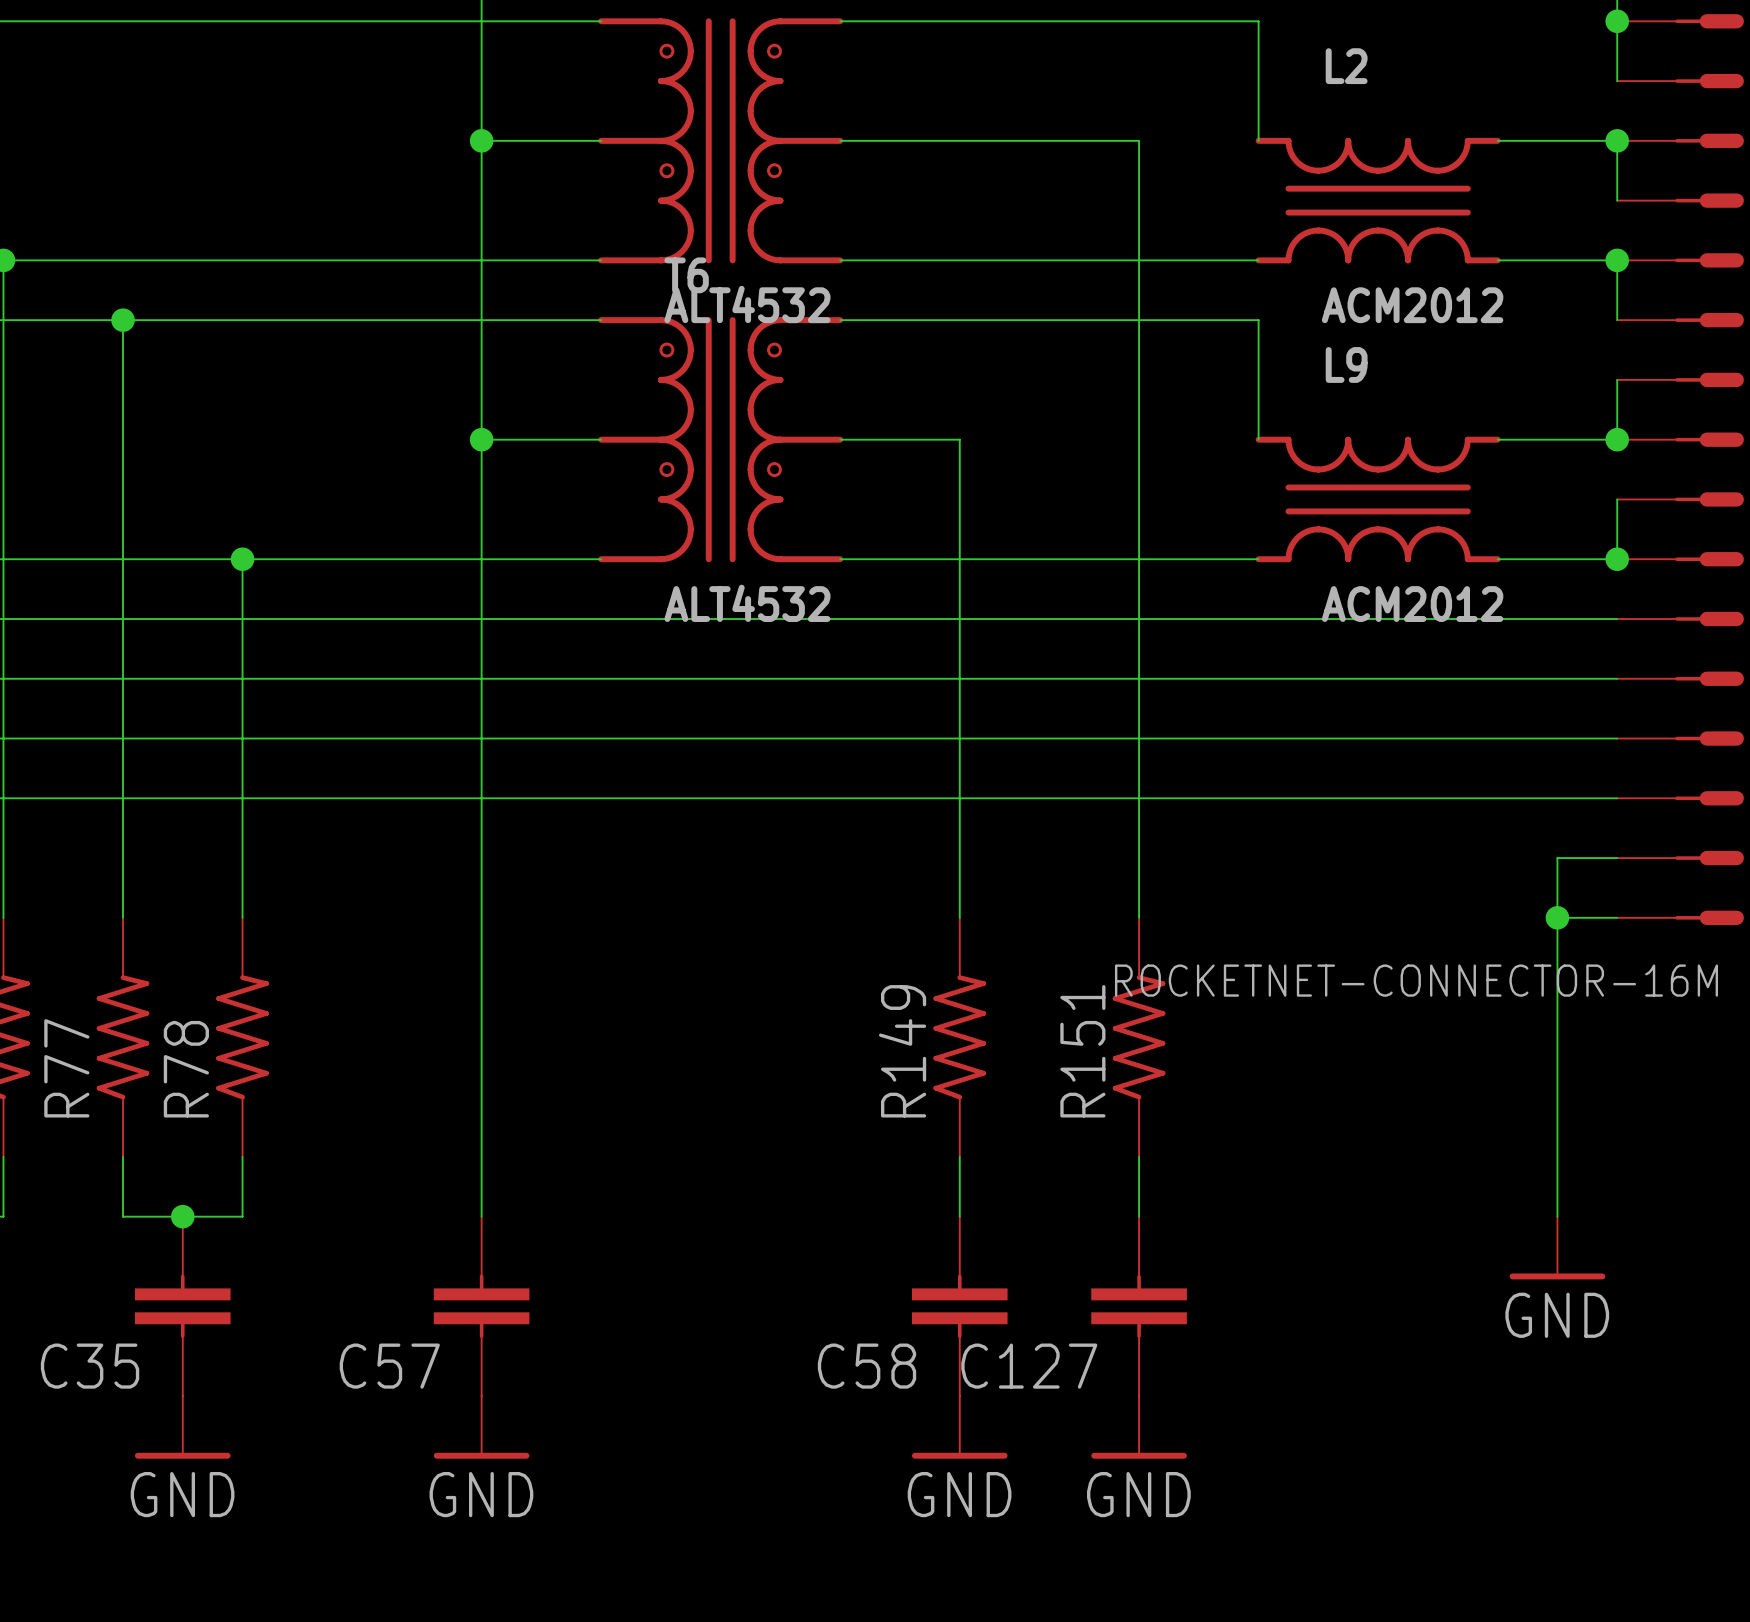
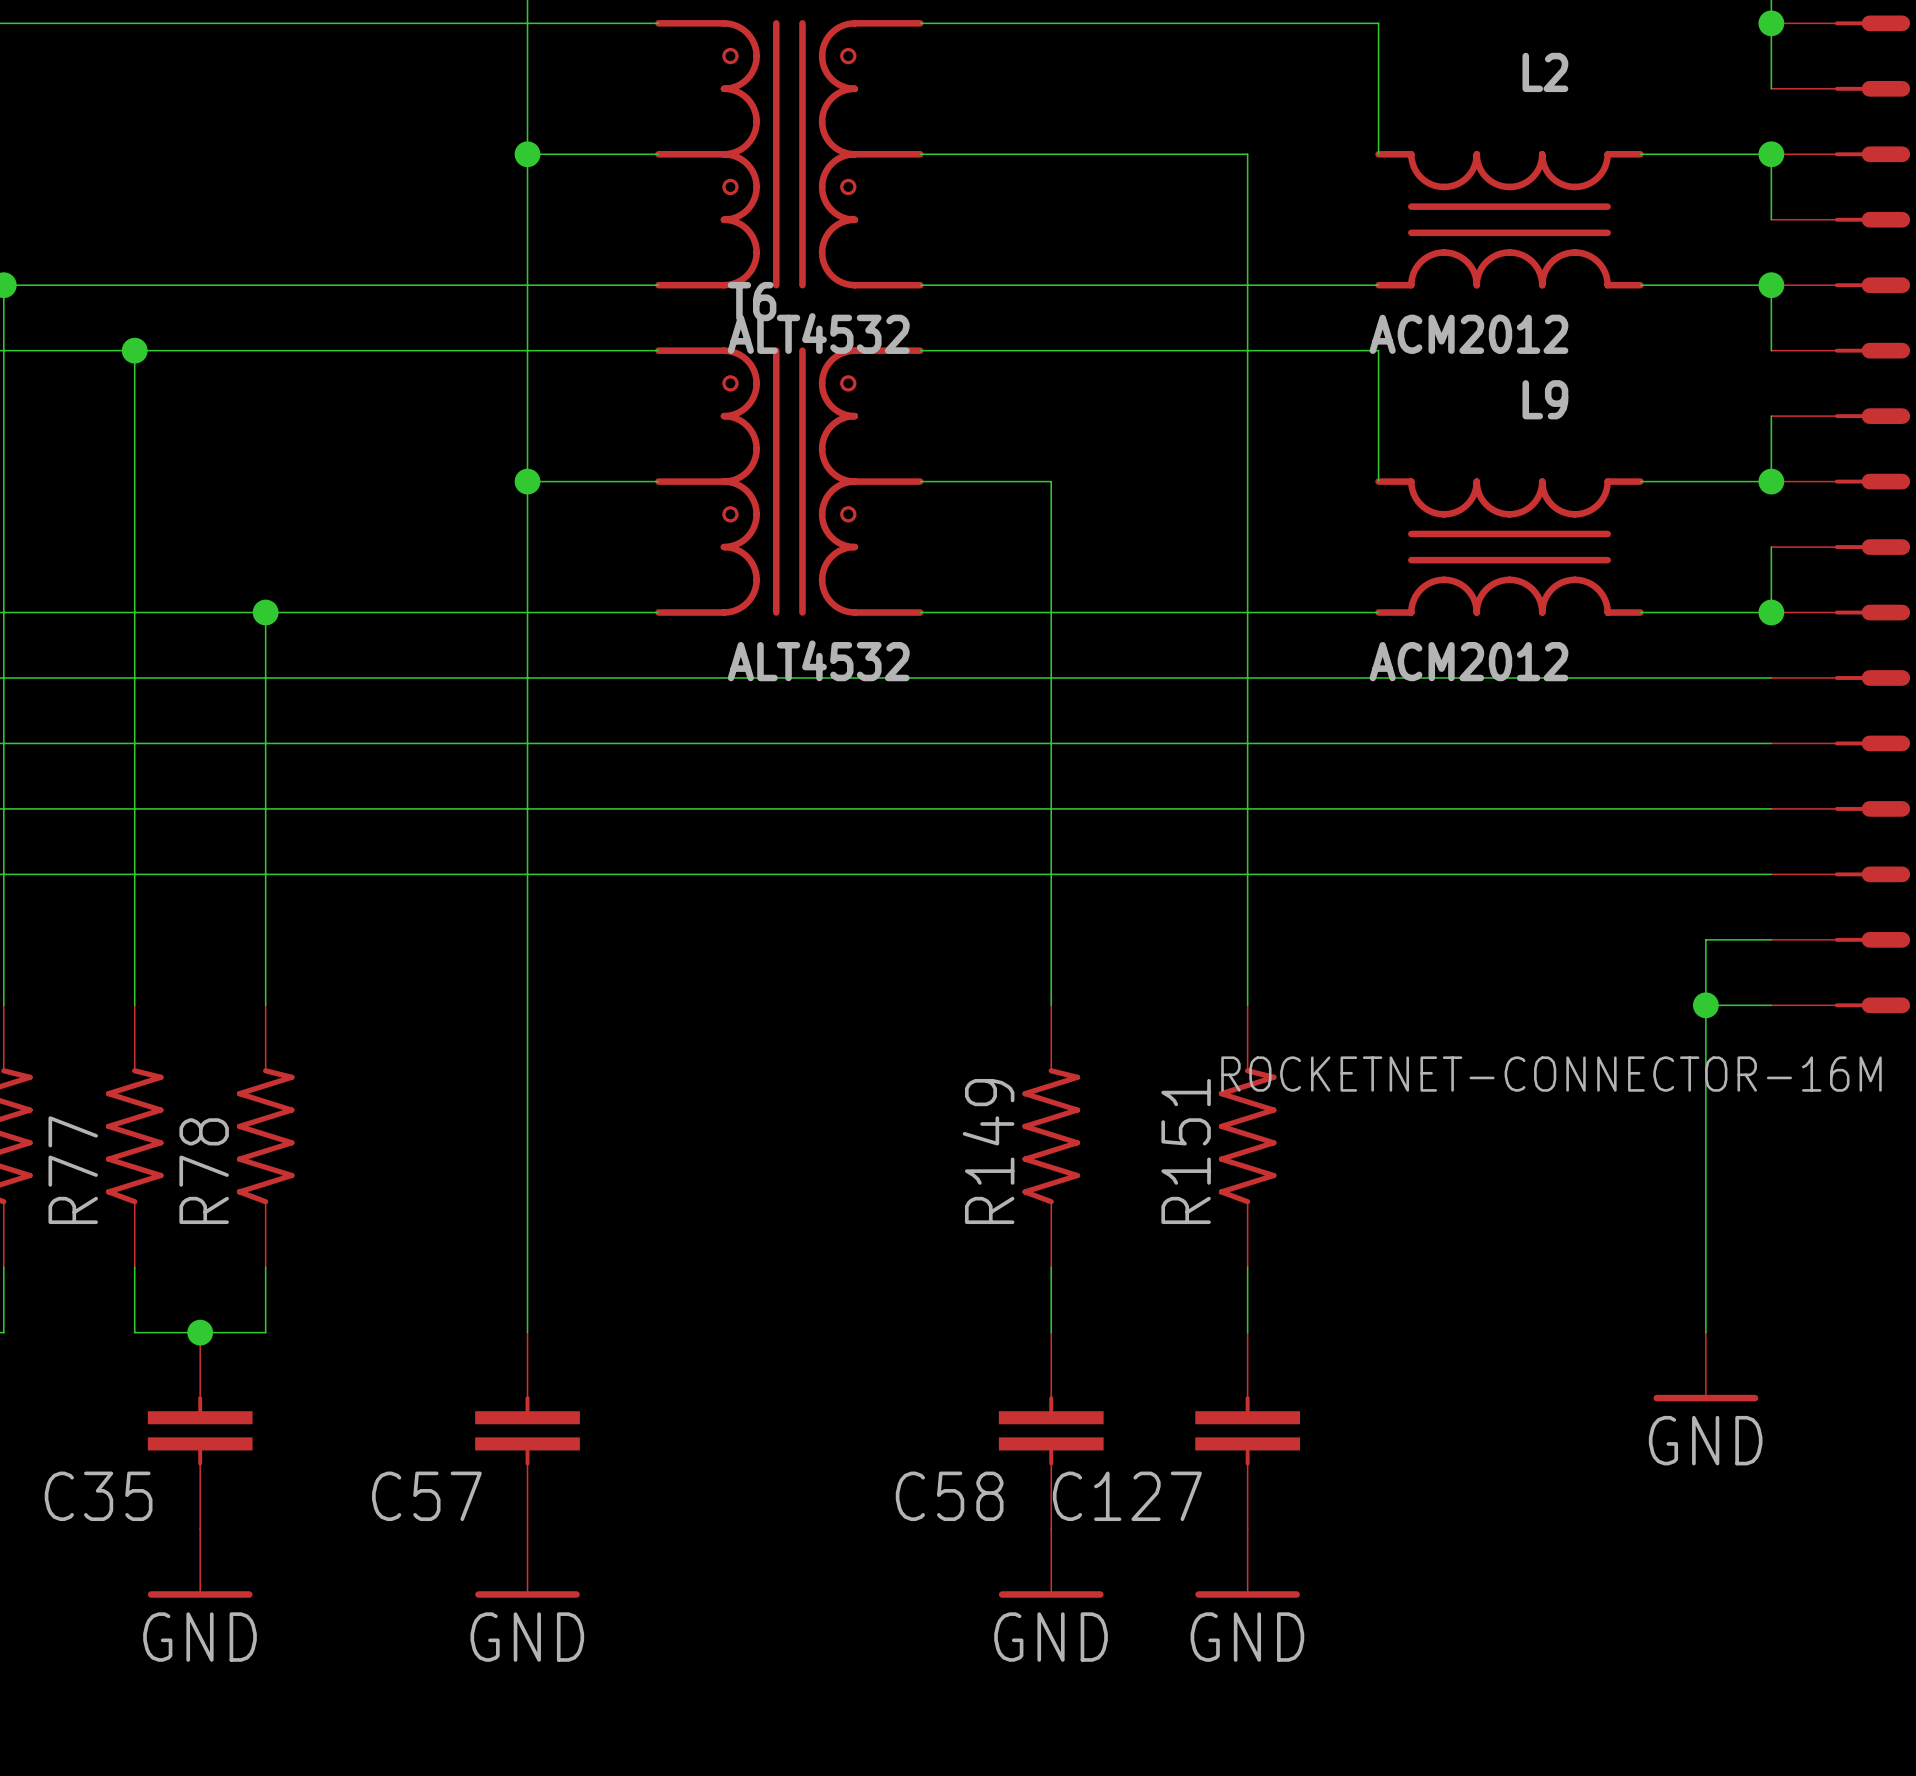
L2 name position: L2 (1346, 66) -> L2 (1545, 72)
L2 value position: ACM2012 (1412, 305) -> ACM2012 (1468, 334)
L9 name position: L9 (1346, 364) -> L9 (1545, 399)
L9 value position: ACM2012 (1412, 604) -> ACM2012 (1468, 661)

